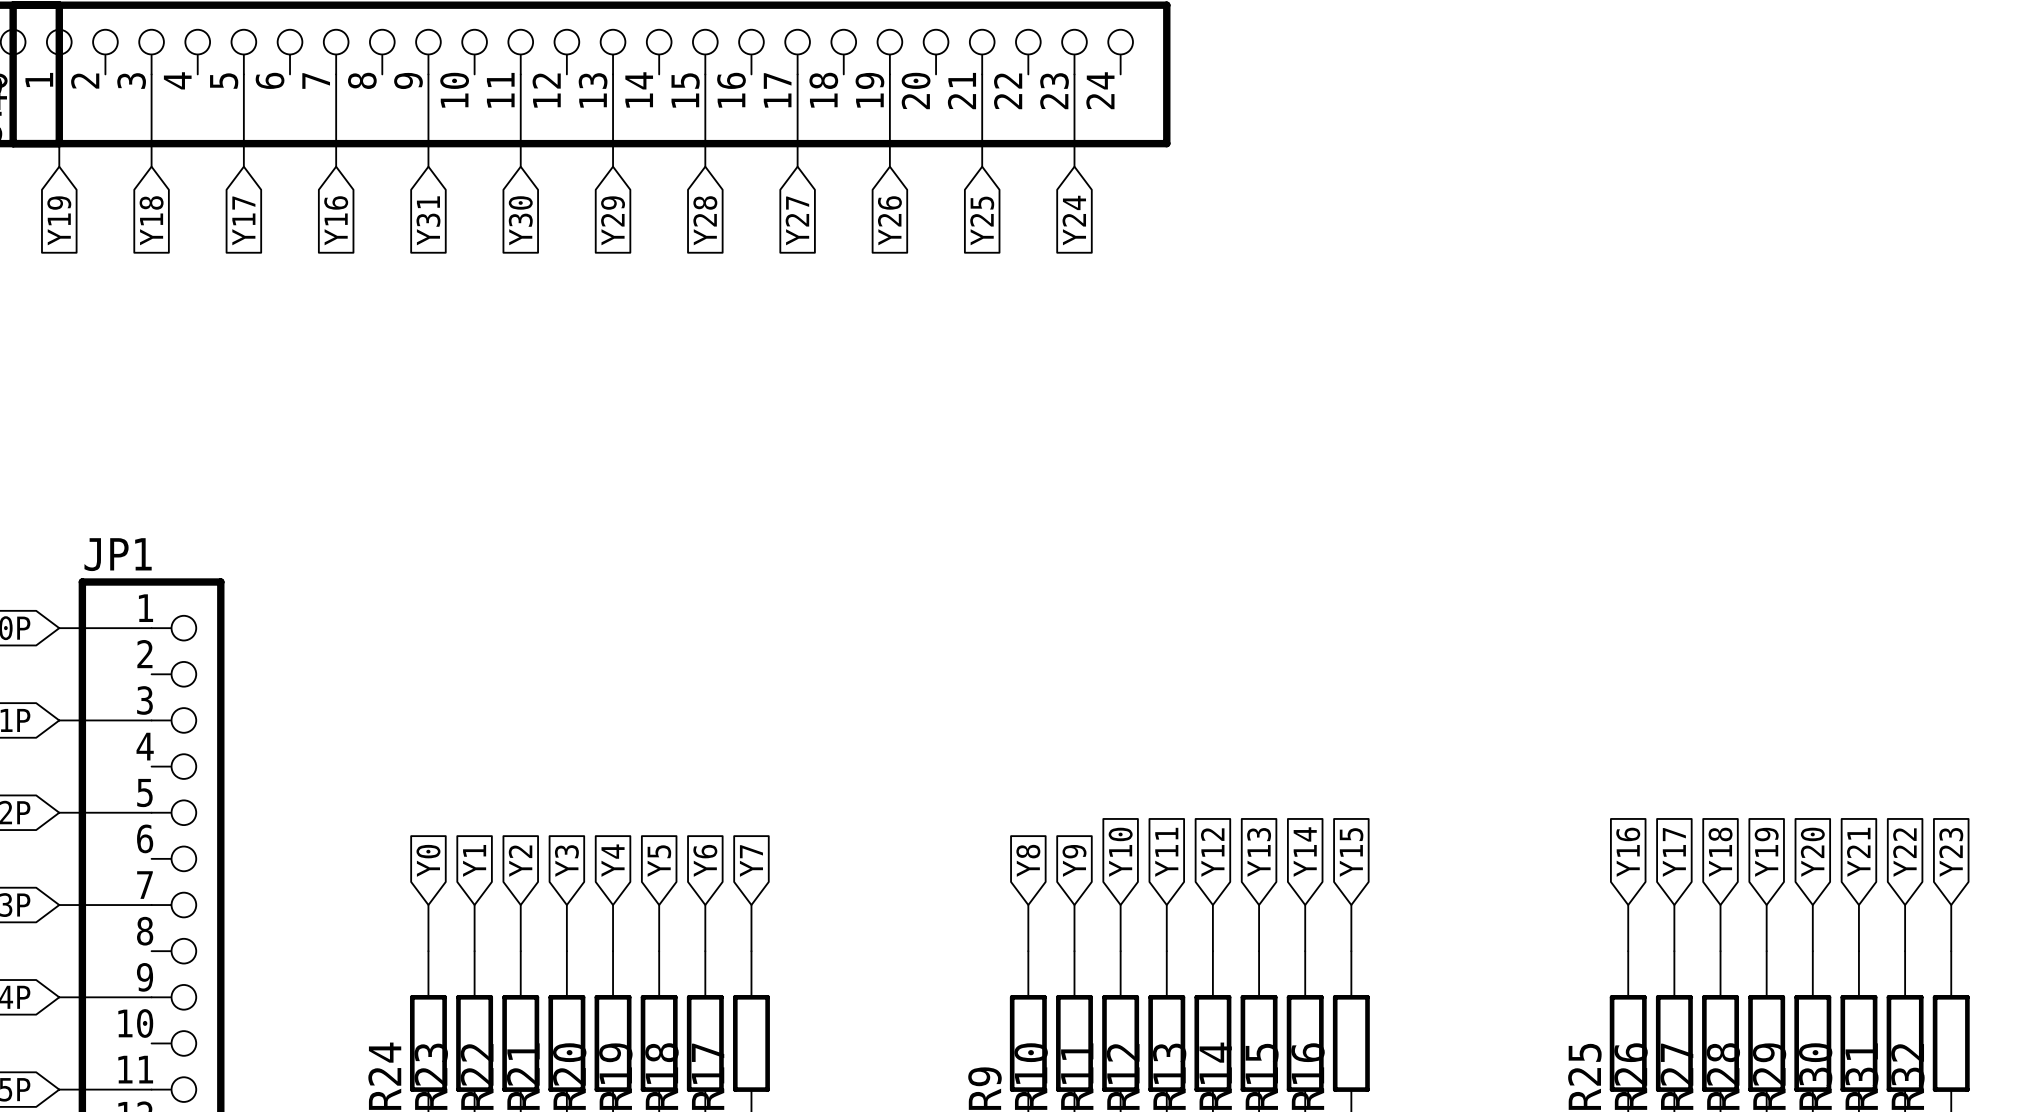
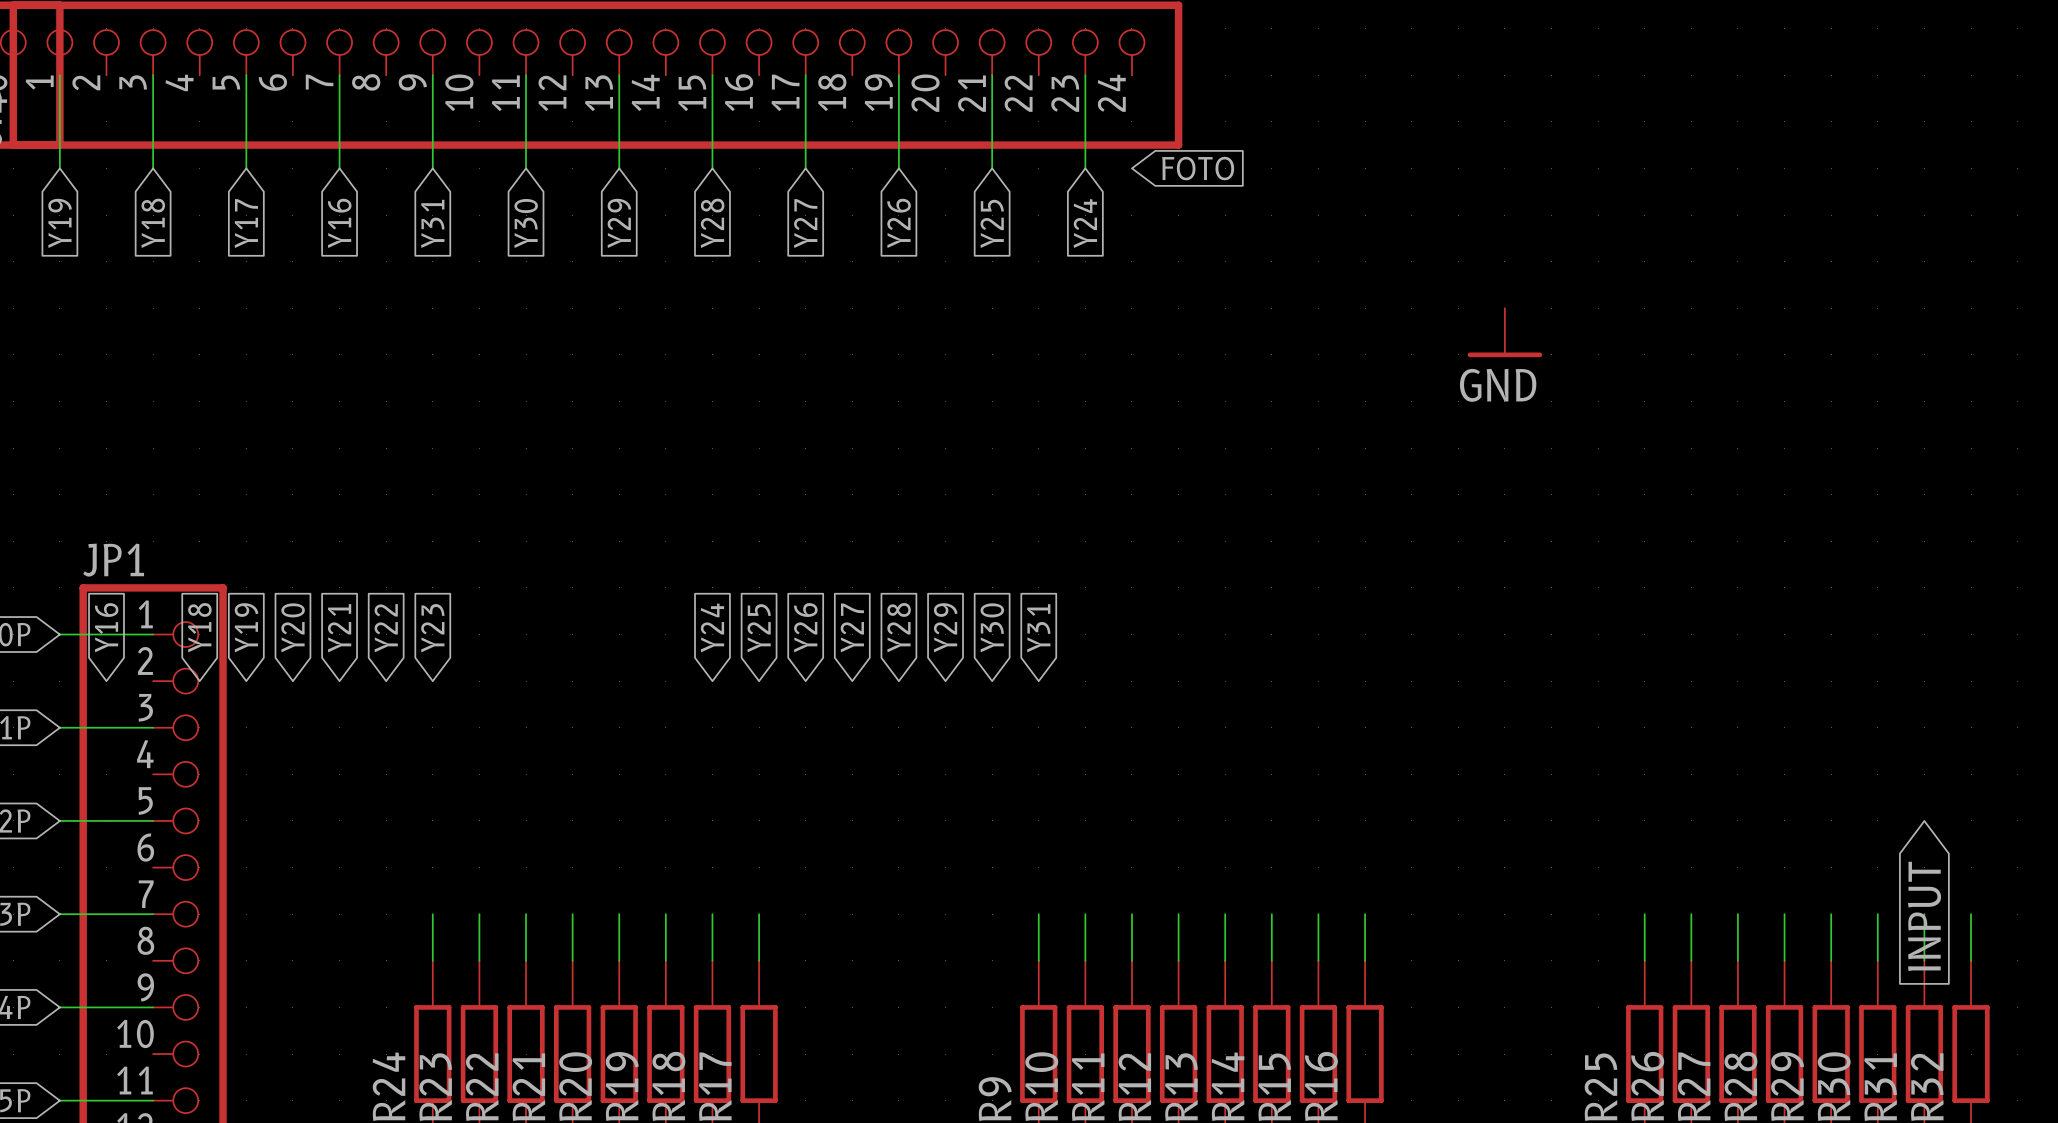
global label: none -> FOTO (1198, 168)
power symbol: none -> GND (1504, 332)
global label: none -> Y16 (106, 627)
global label: none -> Y18 (199, 627)
global label: none -> Y19 (246, 627)
global label: none -> Y20 (293, 627)
global label: none -> Y21 (339, 628)
global label: none -> Y22 (386, 628)
global label: none -> Y23 (432, 628)
global label: none -> Y24 (712, 627)
global label: none -> Y25 (759, 628)
global label: none -> Y26 (805, 627)
global label: none -> Y27 (852, 627)
global label: none -> Y28 (899, 627)
global label: none -> Y29 (945, 627)
global label: none -> Y30 (992, 627)
global label: none -> Y31 (1038, 628)
global label: Y10 (1120, 852) -> none
global label: Y11 (1166, 852) -> none
global label: Y12 (1212, 852) -> none
global label: Y13 (1259, 852) -> none
global label: Y14 (1305, 852) -> none
global label: Y15 (1351, 852) -> none
global label: Y16 (1628, 852) -> none
global label: Y17 (1674, 852) -> none
global label: Y18 (1720, 852) -> none
global label: Y19 (1766, 852) -> none
global label: Y20 (1812, 852) -> none
global label: Y21 (1858, 852) -> none
global label: Y22 (1904, 852) -> none
global label: Y23 (1951, 852) -> none
global label: Y0 (428, 860) -> none
global label: Y1 (474, 860) -> none
global label: Y4 (613, 860) -> none
global label: Y6 (705, 860) -> none
global label: Y8 (1028, 860) -> none
global label: Y9 (1074, 860) -> none
global label: Y2 (520, 861) -> none
global label: Y3 (566, 861) -> none
global label: Y5 (659, 861) -> none
global label: Y7 (751, 861) -> none
global label: none -> INPUT (1924, 916)

